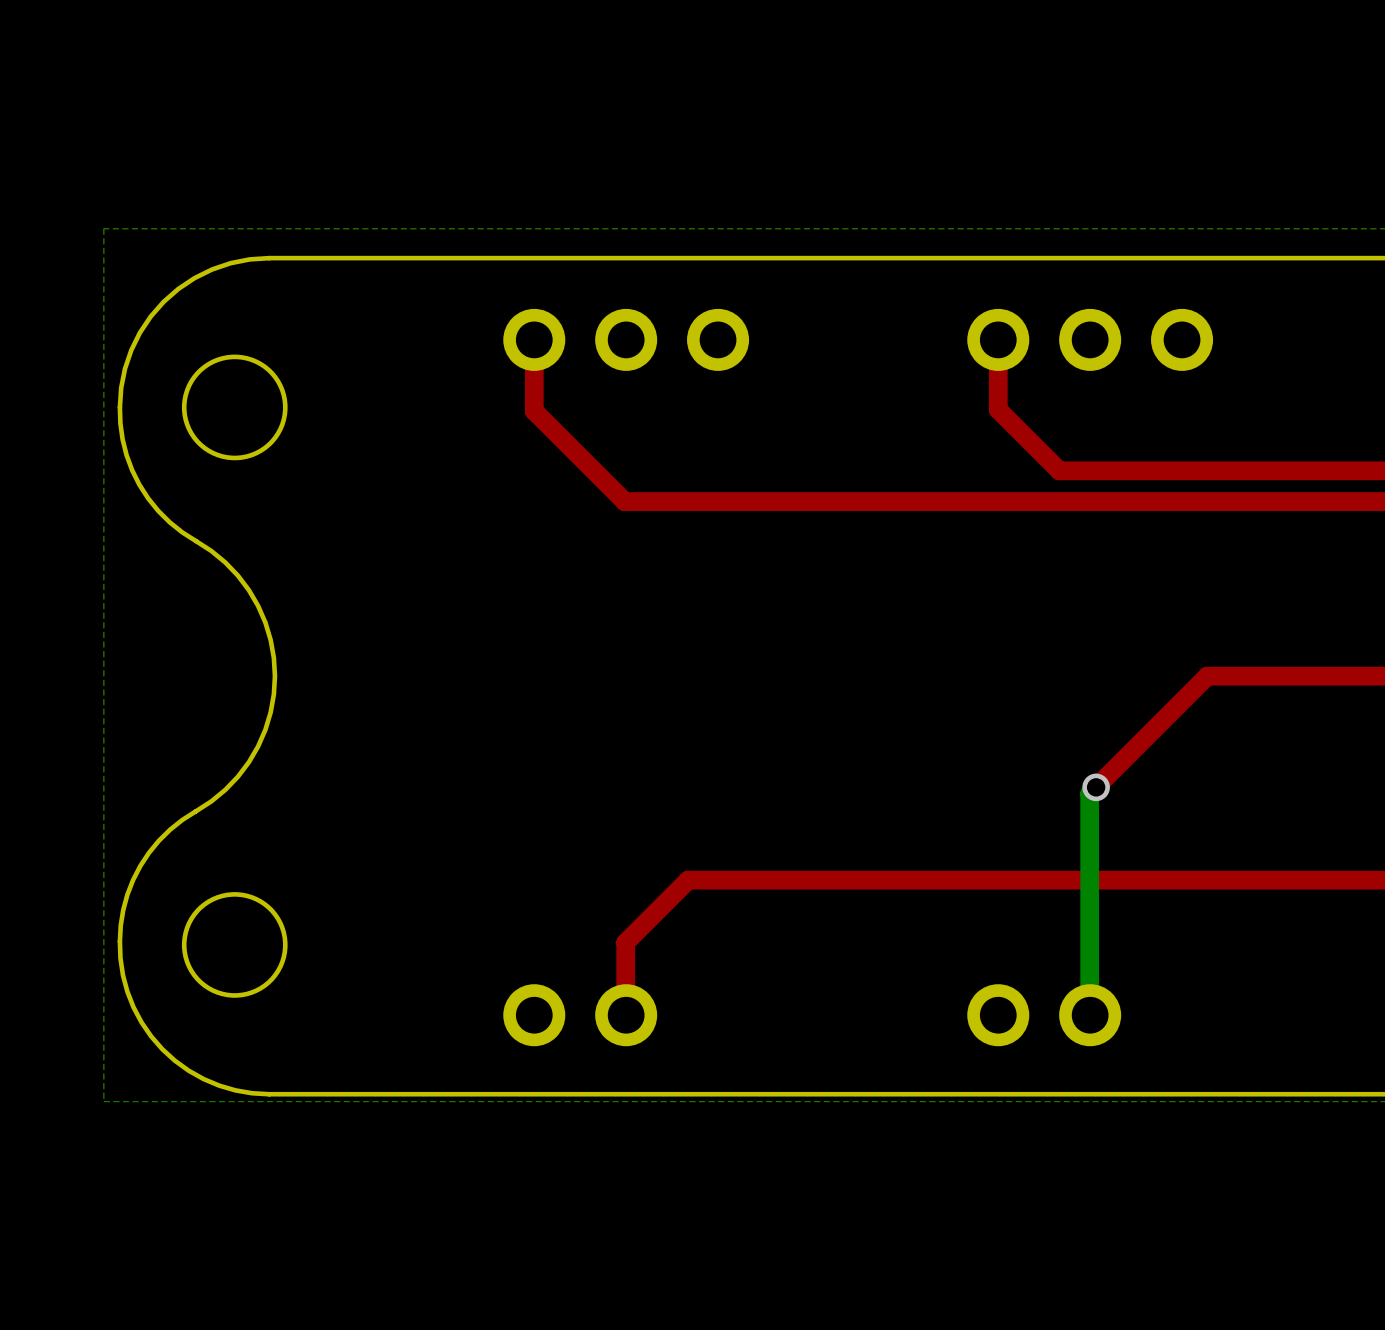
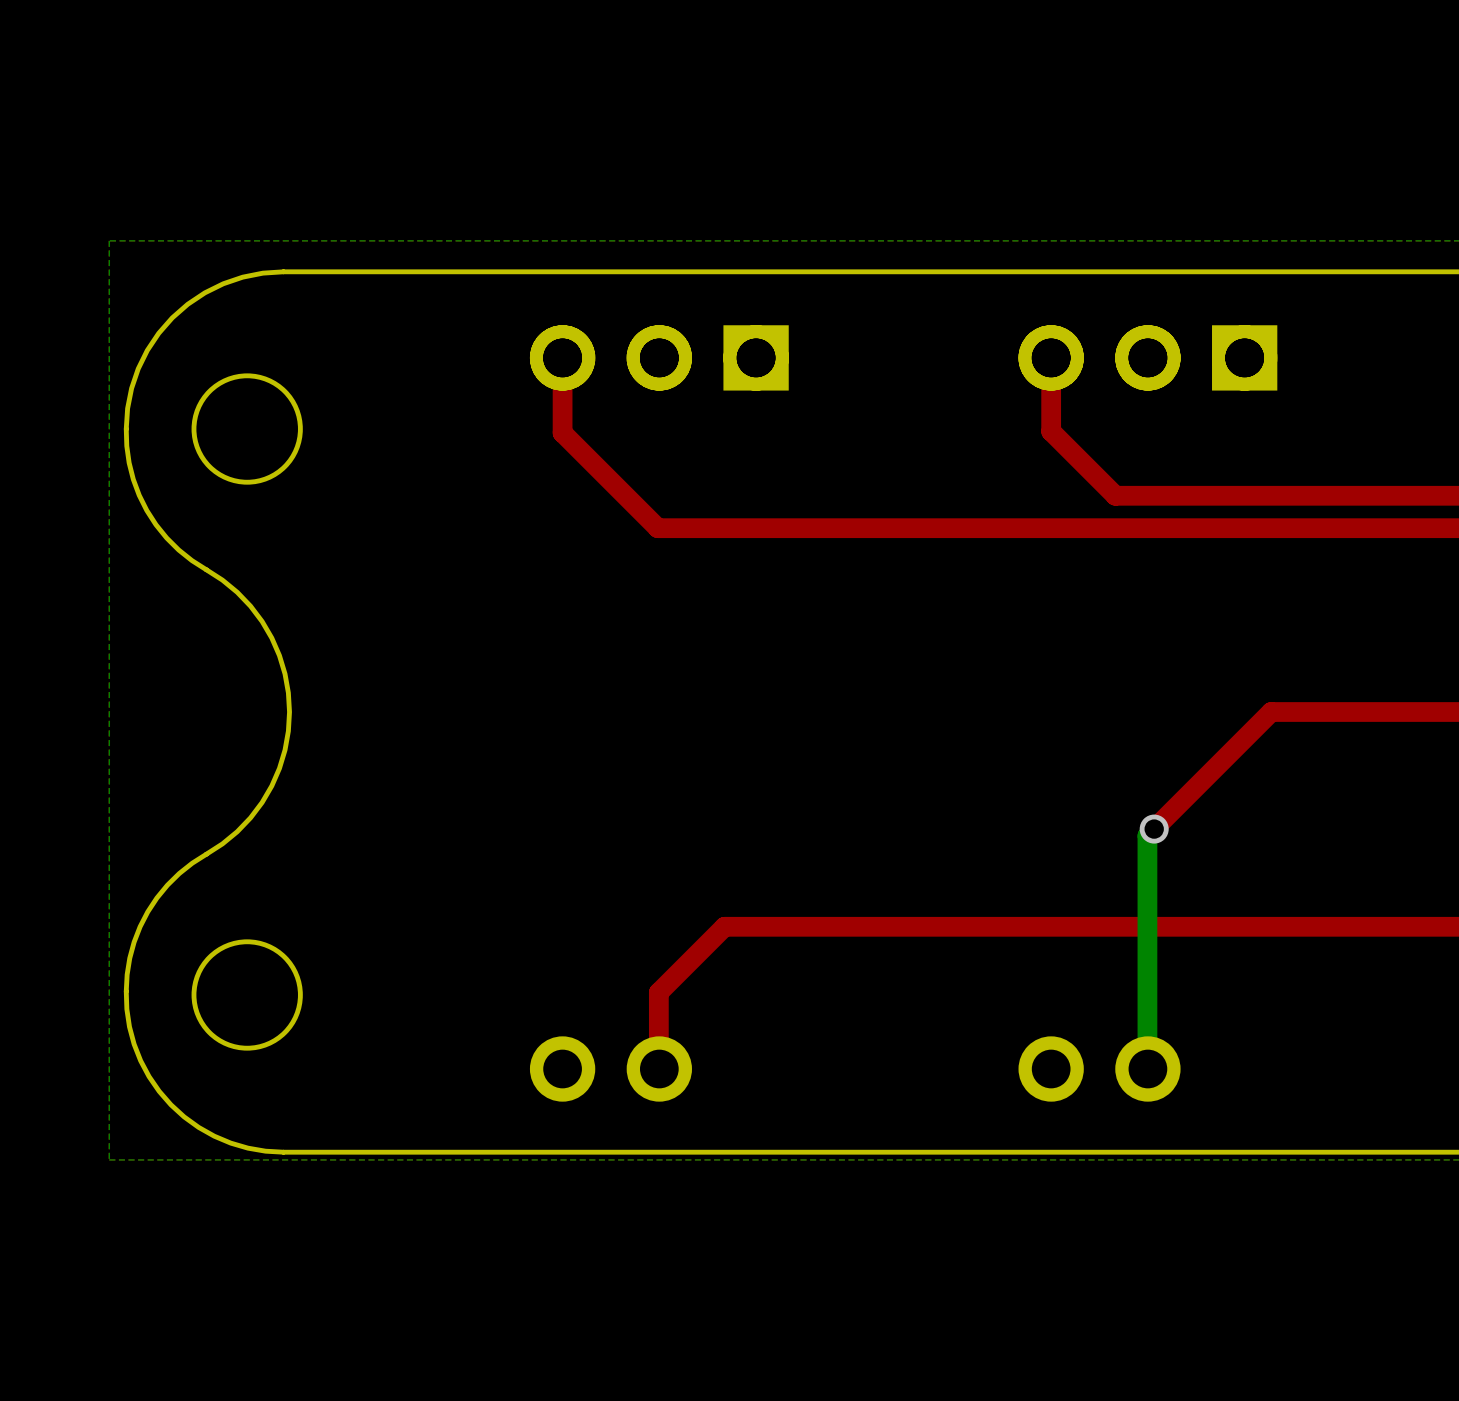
part: none -> (659, 357)
part: none -> (1147, 357)

